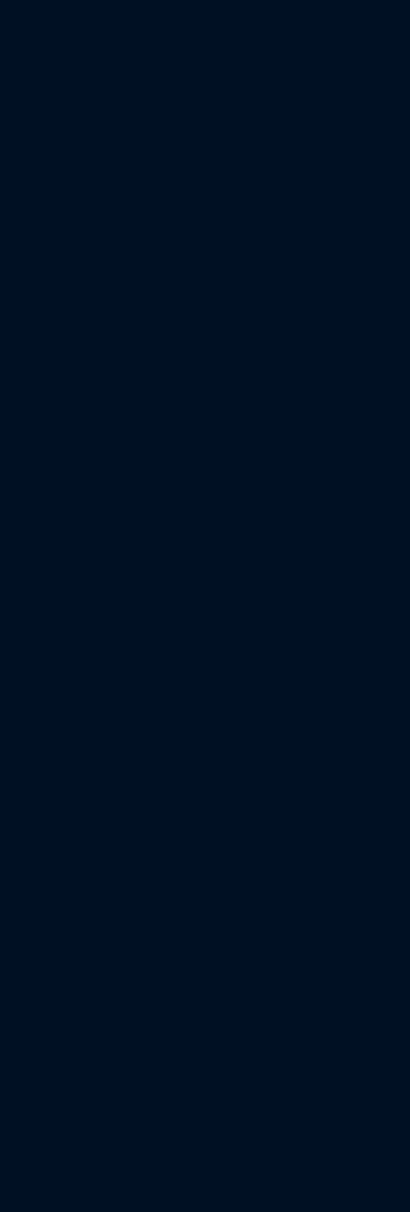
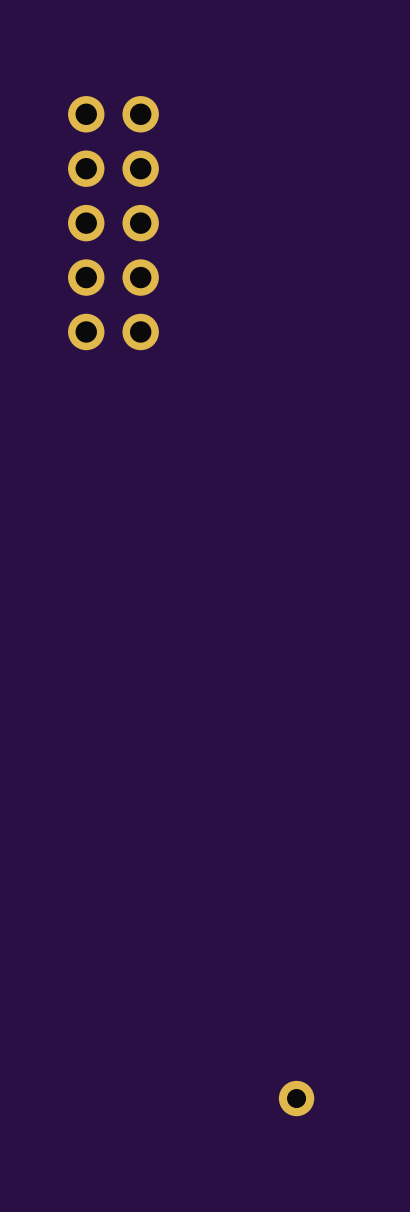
part: none -> (113, 223)
part: none -> (296, 1098)

